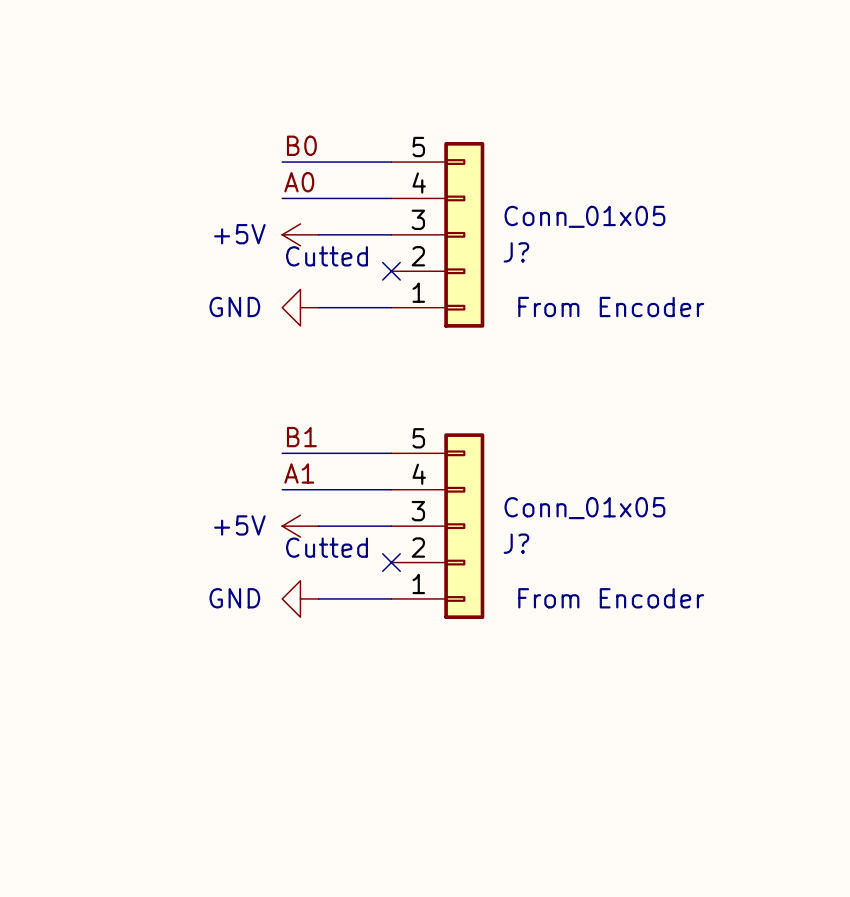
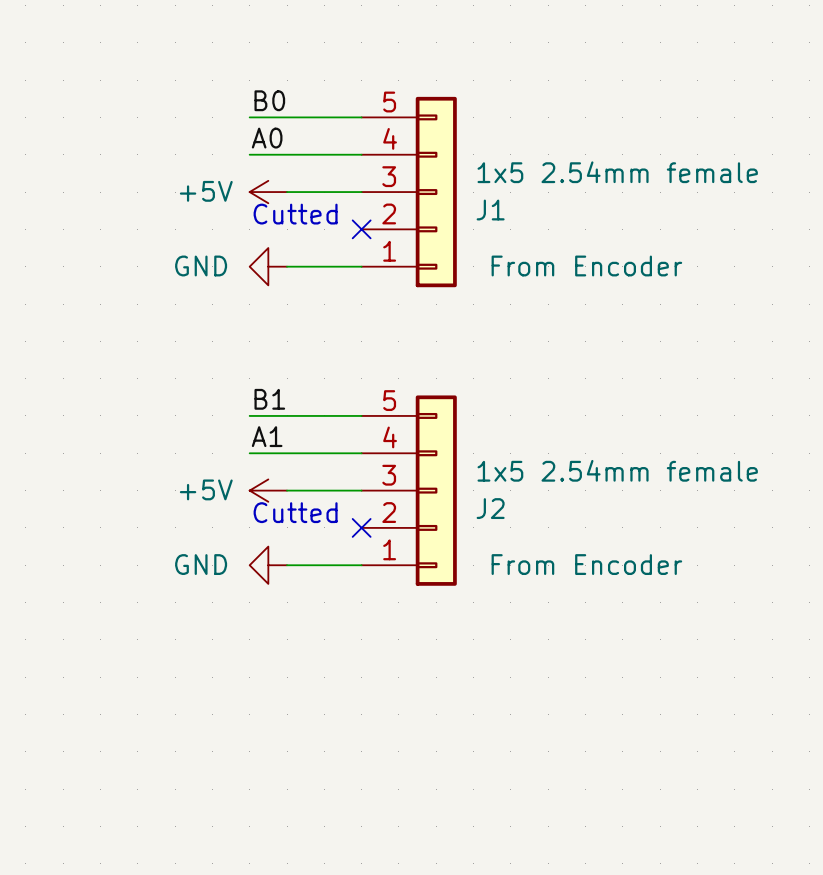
J? value: Conn_01x05 (584, 216) -> 1x5 2.54mm female (617, 172)
J? name: J? (516, 252) -> J1 (490, 210)
J? value: Conn_01x05 (584, 508) -> 1x5 2.54mm female (617, 470)
J? name: J? (516, 543) -> J2 (490, 508)

